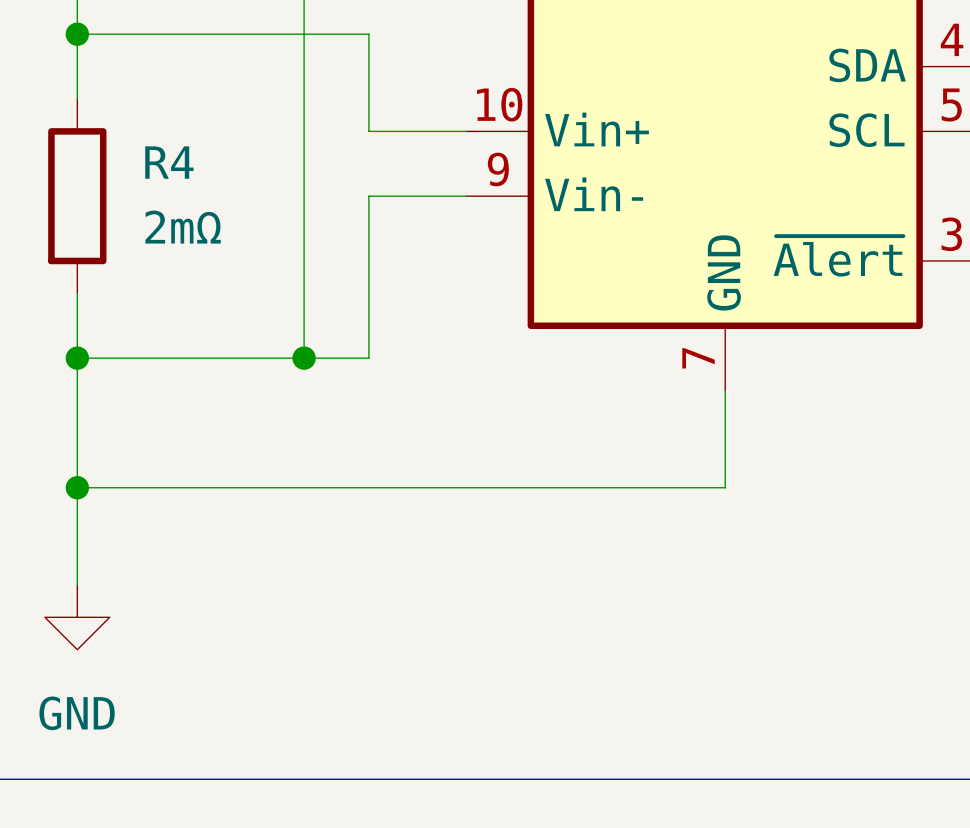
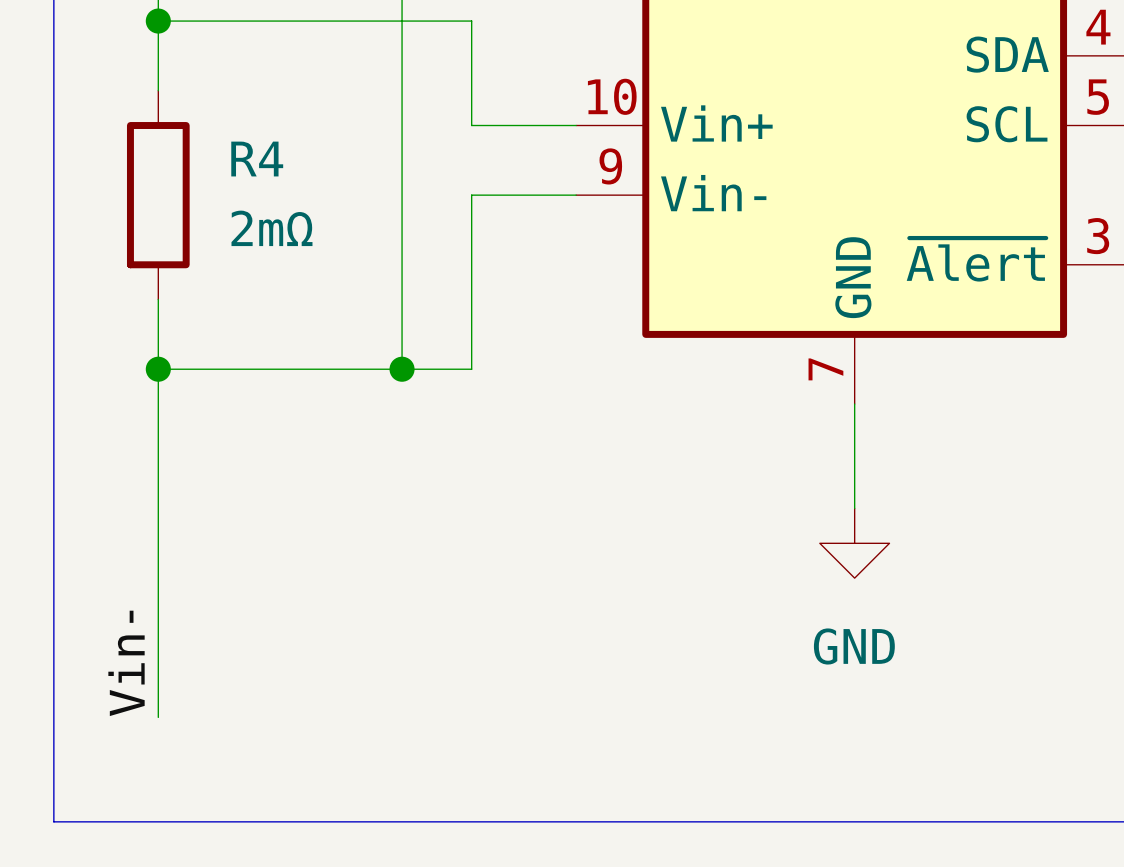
wire: (77, 487) (725, 487) -> none
junction: (77, 487) -> none
power symbol: none -> GND (854, 543)
wire: none -> (158, 612) (158, 717)
power symbol: GND (77, 617) -> none
label: none -> Vin- (126, 663)

